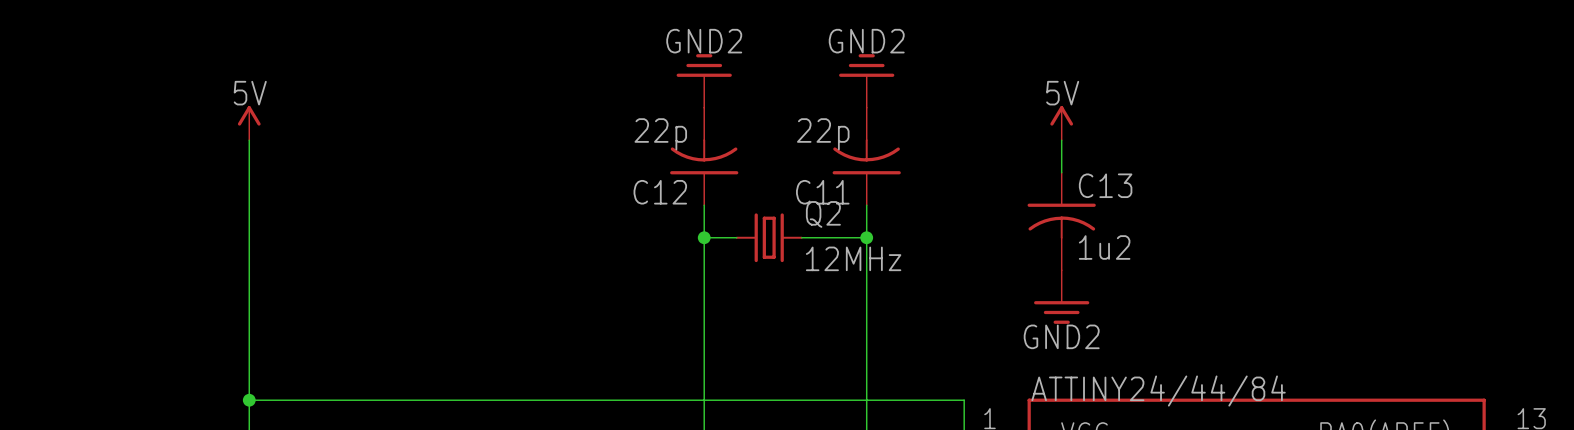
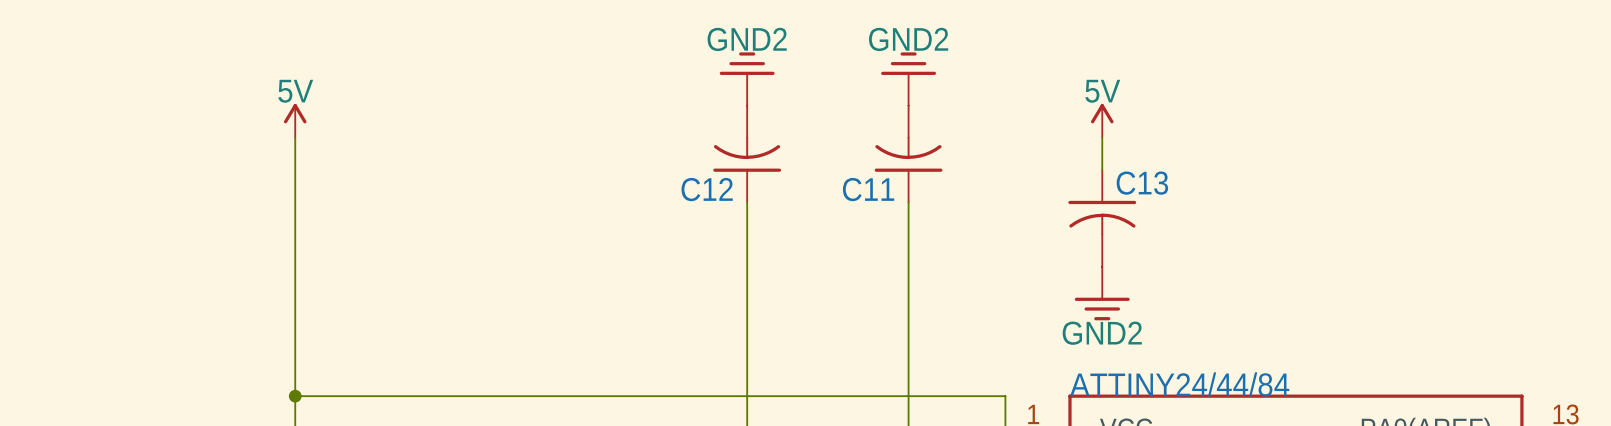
C12 value: 22p (660, 134) -> none
C11 value: 22p (823, 134) -> none
wire: (704, 237) (736, 237) -> none
junction: (704, 237) -> none
Q2: 12MHz (769, 237) -> none
wire: (801, 237) (866, 237) -> none
junction: (866, 237) -> none
C13 value: 1u2 (1104, 247) -> none

